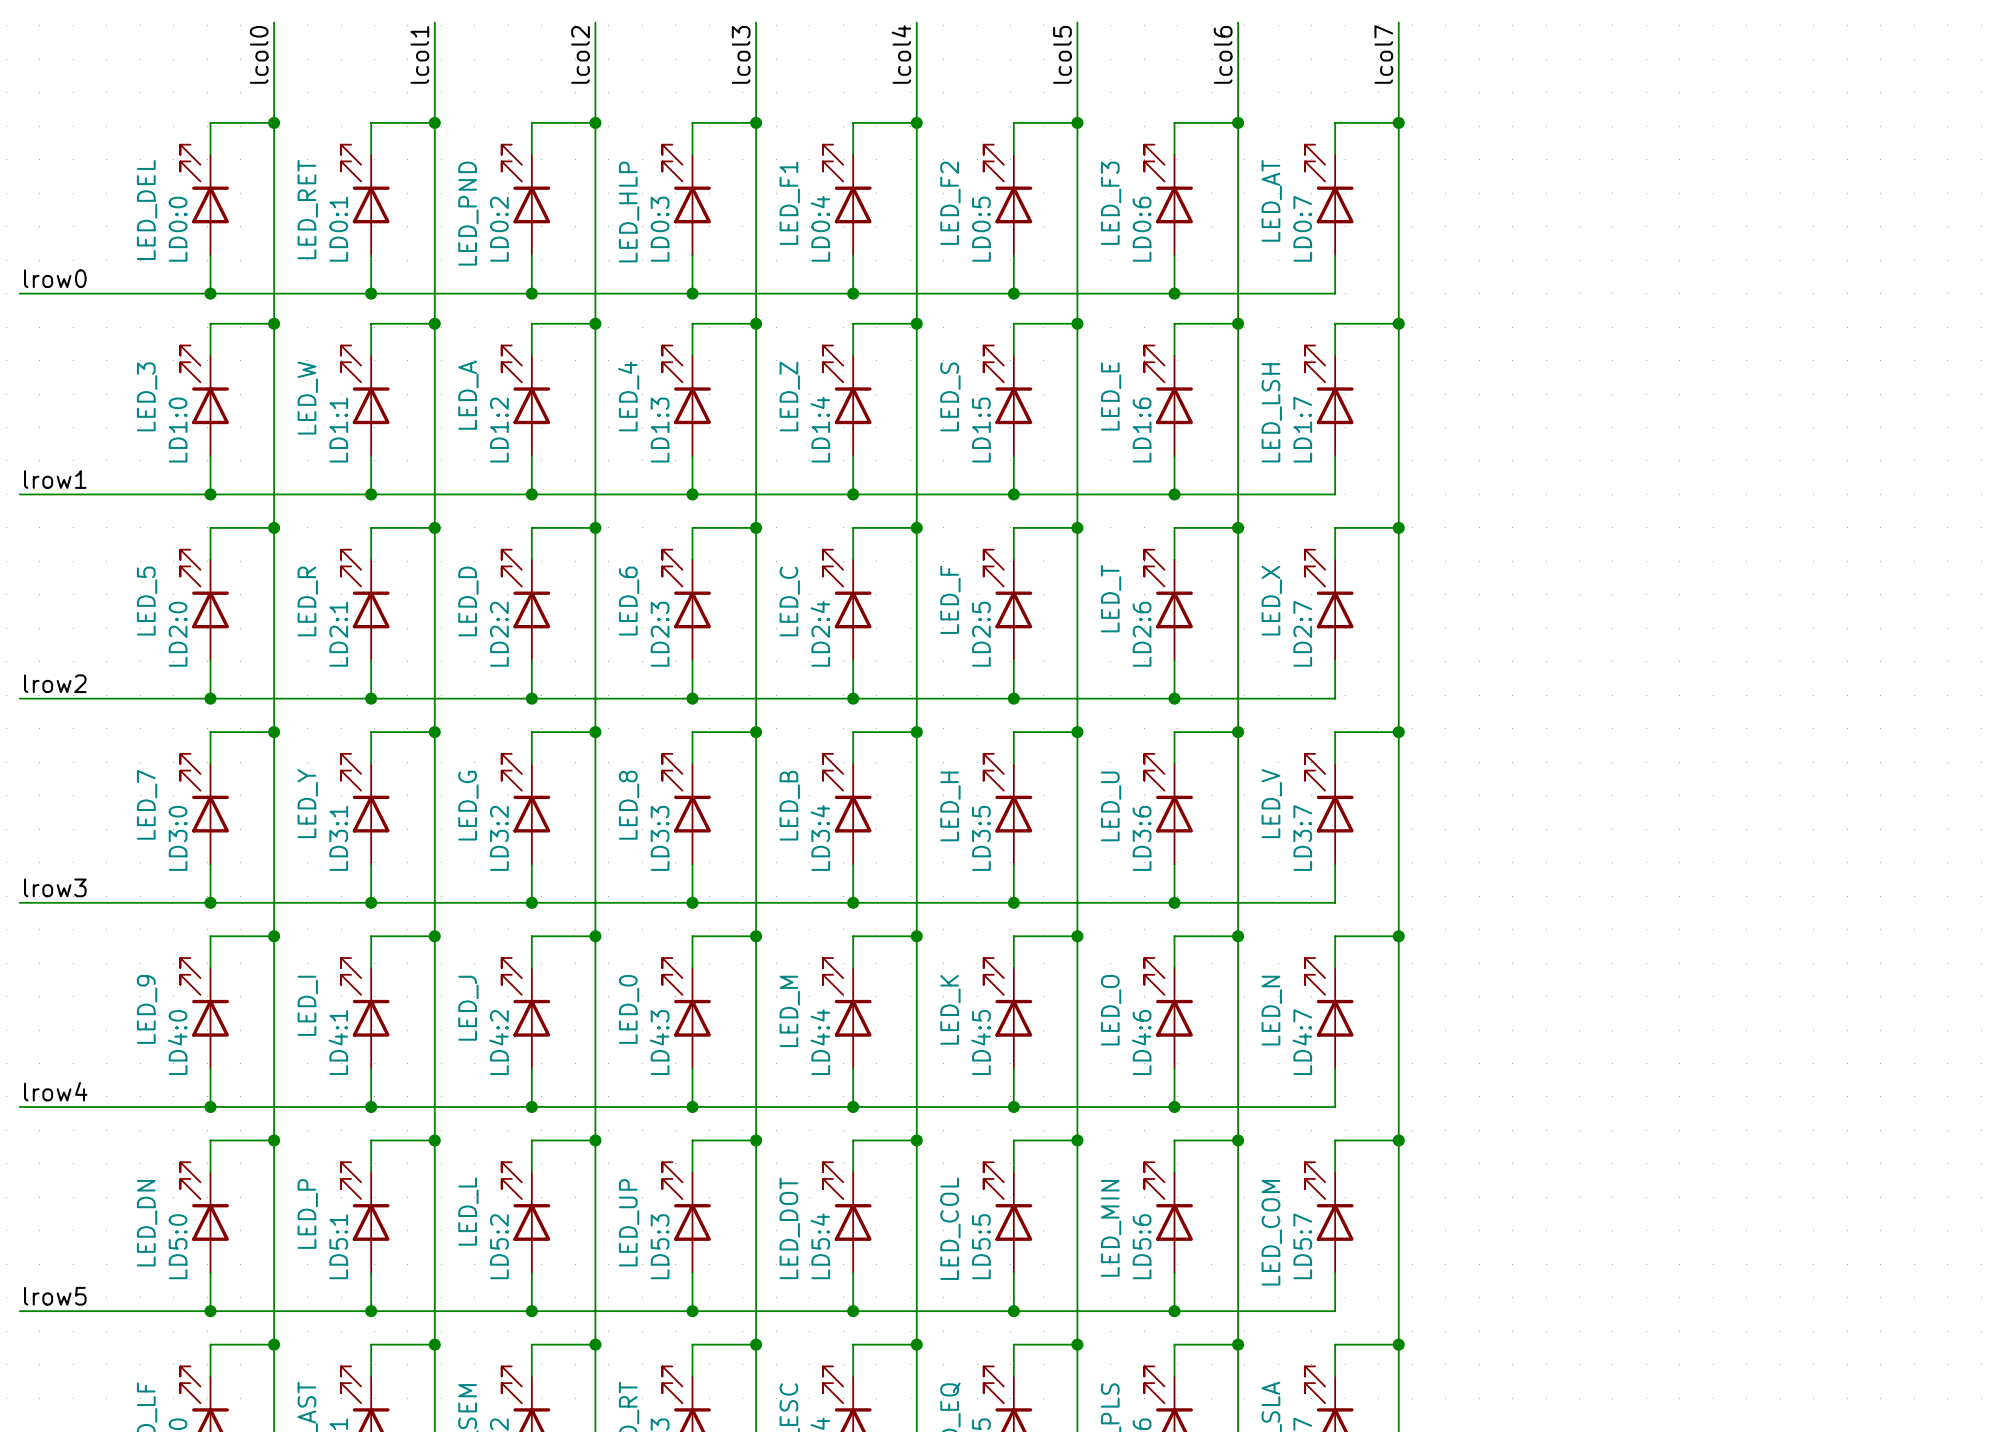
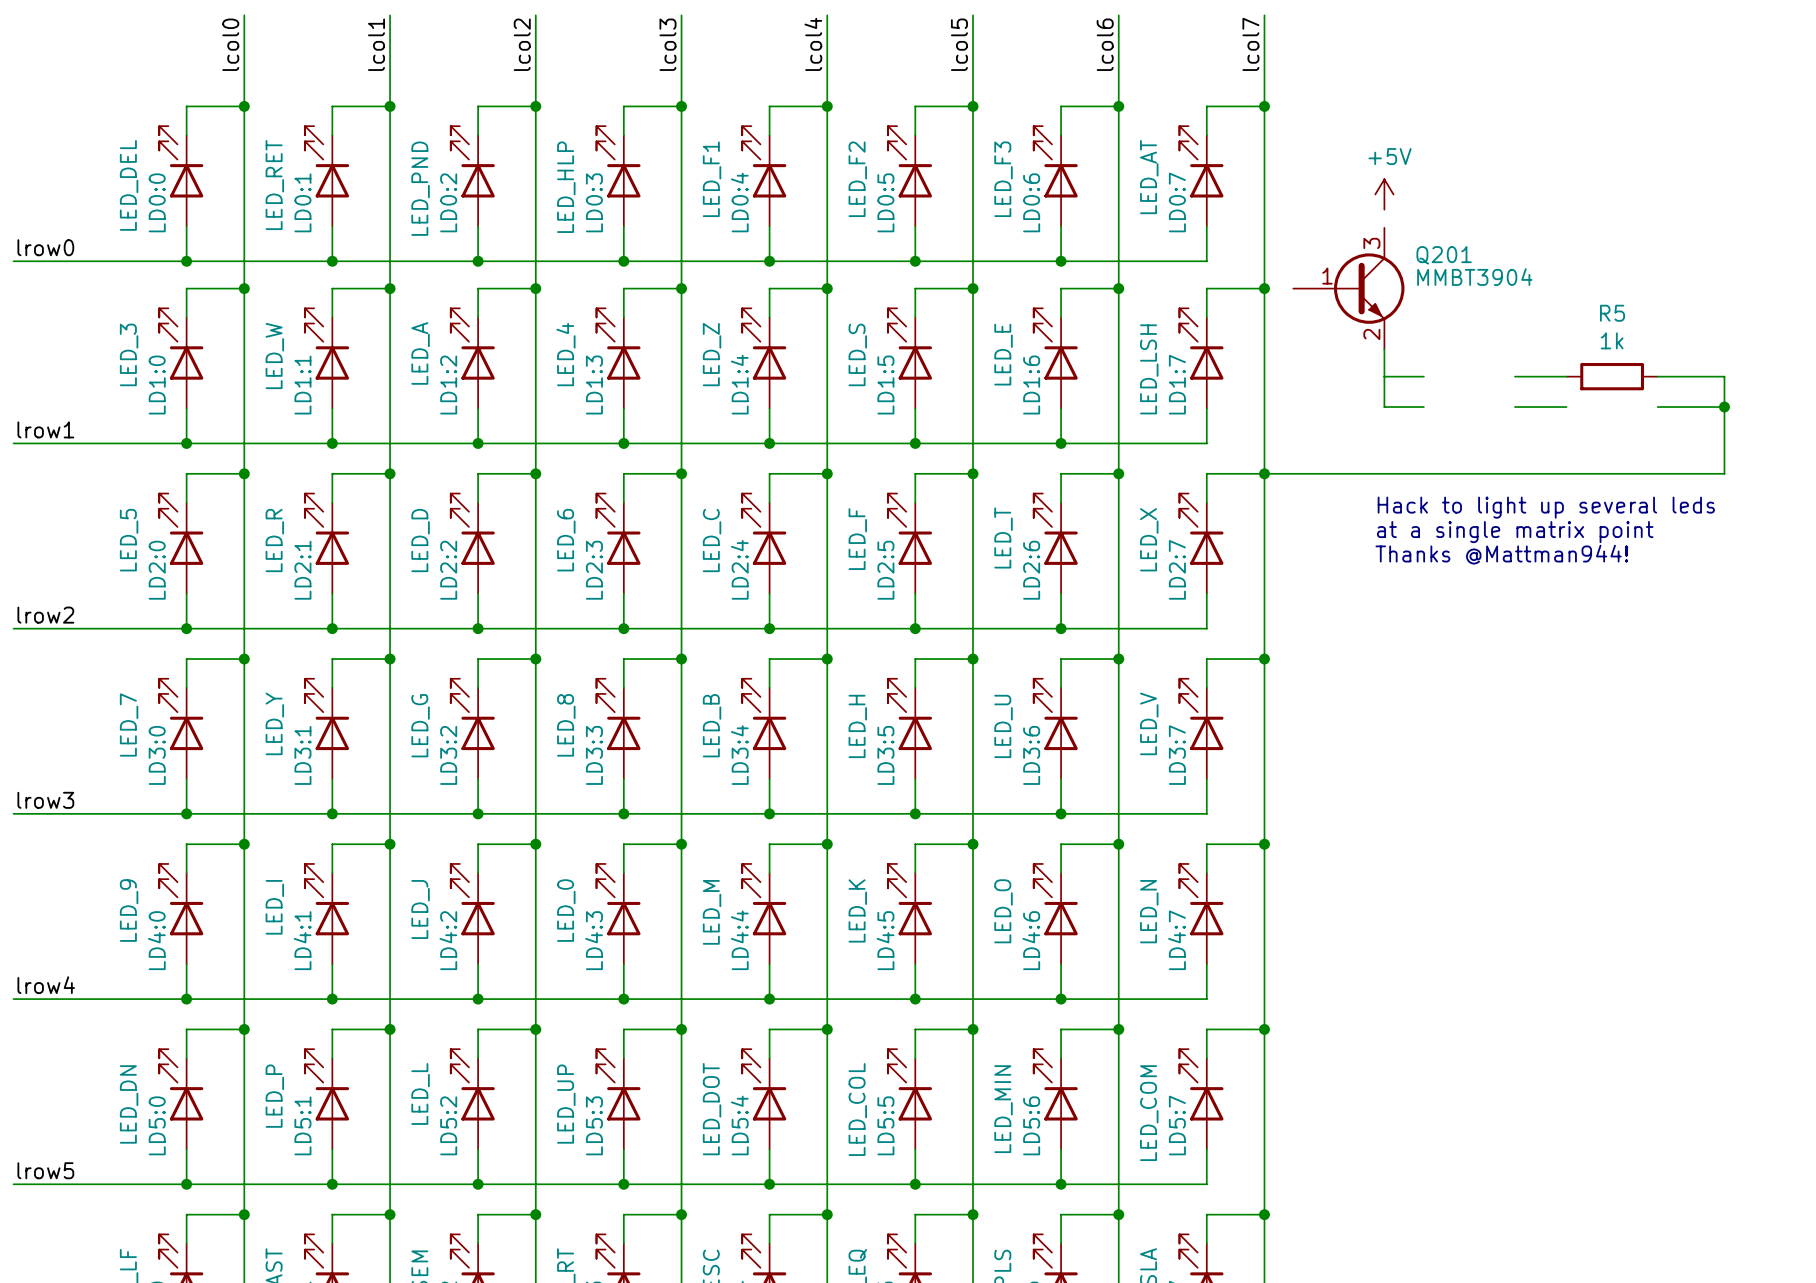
power symbol: none -> +5V (1384, 194)
Q201: none -> MMBT3904 (1348, 288)
wire: none -> (1384, 349) (1384, 407) (1423, 407)
wire: none -> (1384, 376) (1423, 376)
wire: none -> (1514, 376) (1566, 376)
R5: none -> 1k (1612, 376)
wire: none -> (1657, 376) (1724, 376) (1724, 473) (1264, 473)
wire: none -> (1514, 407) (1566, 407)
wire: none -> (1657, 407) (1724, 407)
junction: none -> (1724, 407)
text: none -> Hack to light up several leds (1546, 507)
text: none -> at a single matrix point (1515, 532)
text: none -> Thanks @Mattman944! (1501, 554)

